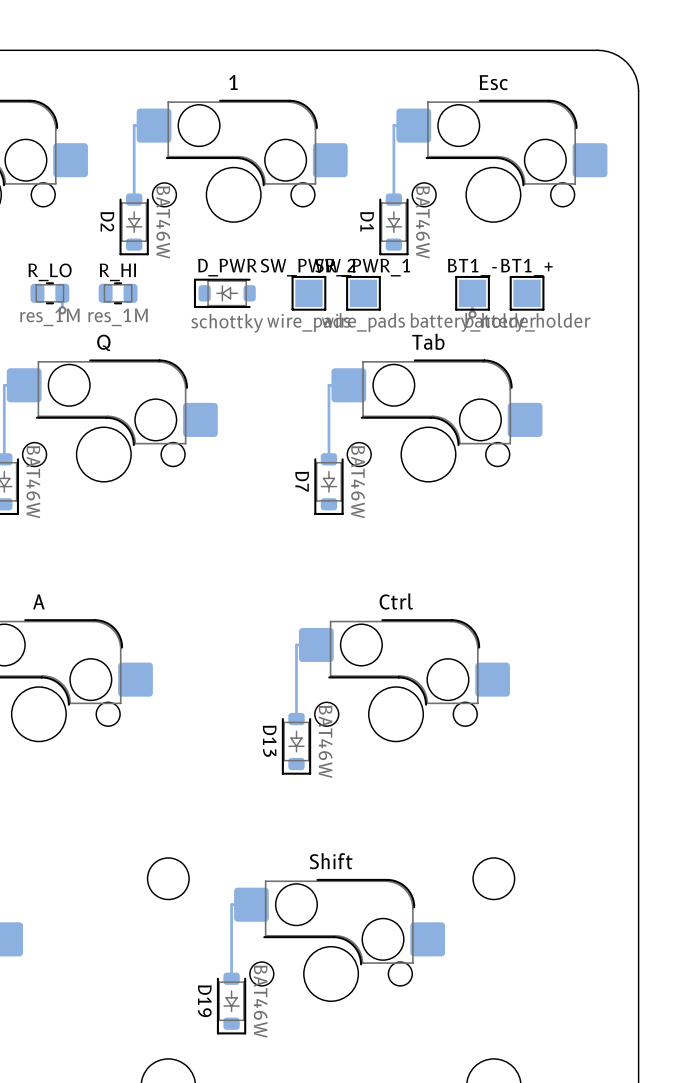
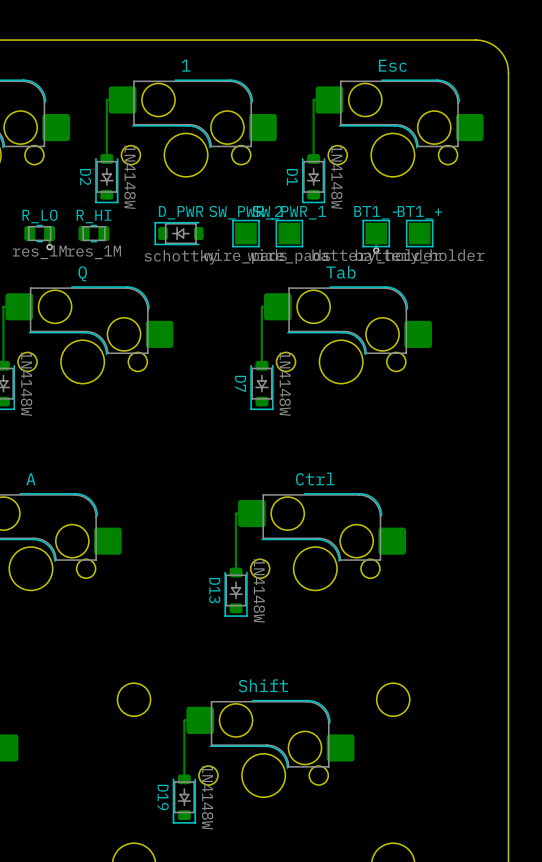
D2 value: BAT46W (163, 222) -> 1N4148W (130, 176)
D1 value: BAT46W (422, 222) -> 1N4148W (336, 176)
part value: BAT46W (33, 482) -> 1N4148W (26, 383)
D7 value: BAT46W (358, 482) -> 1N4148W (285, 383)
D13 value: BAT46W (325, 741) -> 1N4148W (259, 590)
D19 value: BAT46W (260, 1001) -> 1N4148W (207, 797)

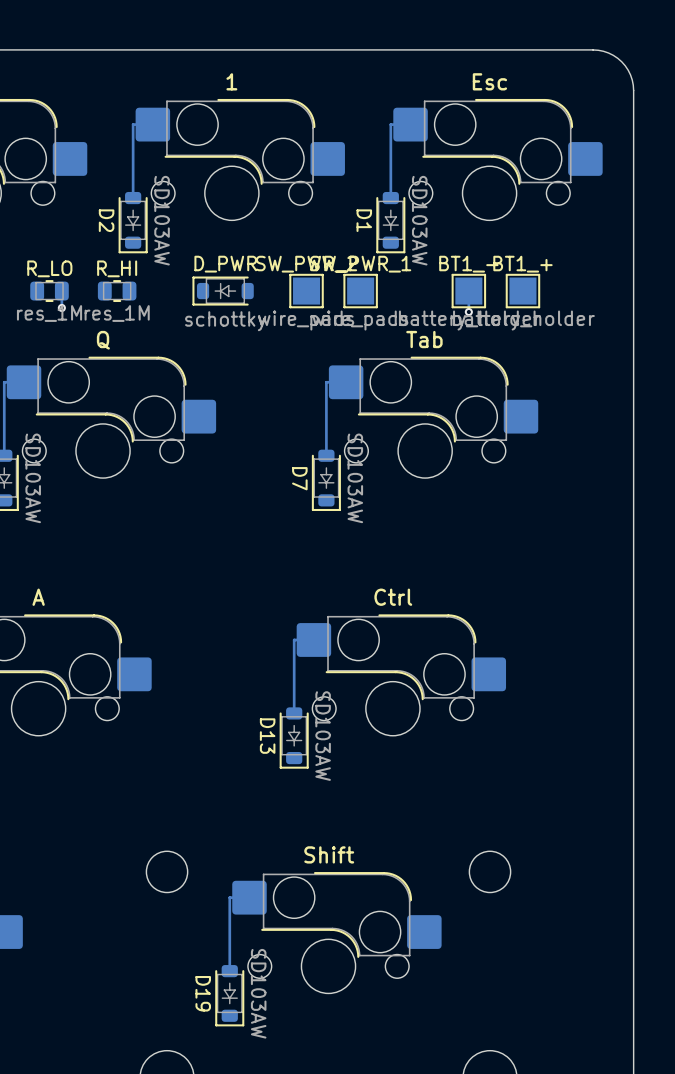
D2 value: 1N4148W (130, 176) -> SD103AW (162, 220)
D1 value: 1N4148W (336, 176) -> SD103AW (419, 220)
part value: 1N4148W (26, 383) -> SD103AW (33, 478)
D7 value: 1N4148W (285, 383) -> SD103AW (355, 478)
D13 value: 1N4148W (259, 590) -> SD103AW (323, 736)
D19 value: 1N4148W (207, 797) -> SD103AW (258, 993)

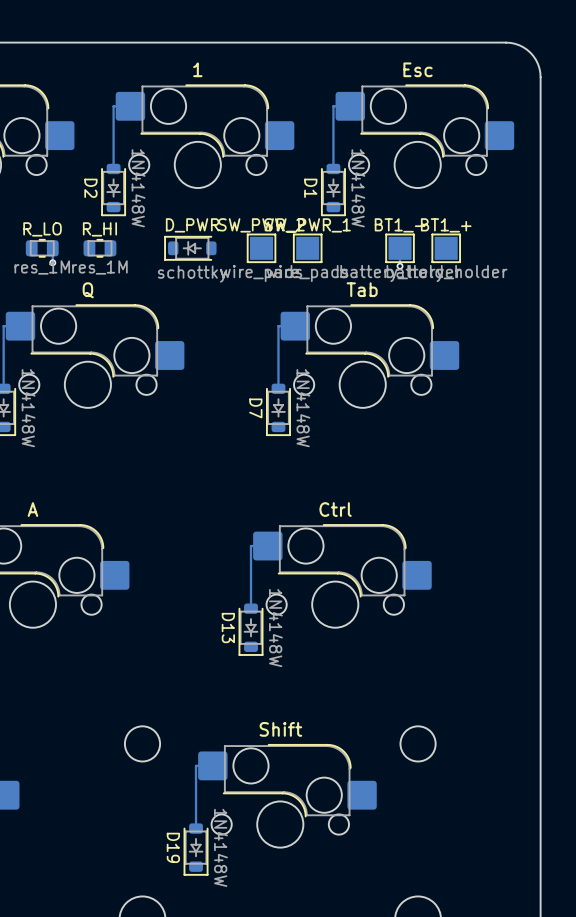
D2 value: SD103AW (162, 220) -> 1N4148W (138, 188)
D1 value: SD103AW (419, 220) -> 1N4148W (358, 188)
part value: SD103AW (33, 478) -> 1N4148W (28, 408)
D7 value: SD103AW (355, 478) -> 1N4148W (303, 408)
D13 value: SD103AW (323, 736) -> 1N4148W (275, 628)
D19 value: SD103AW (258, 993) -> 1N4148W (220, 847)

